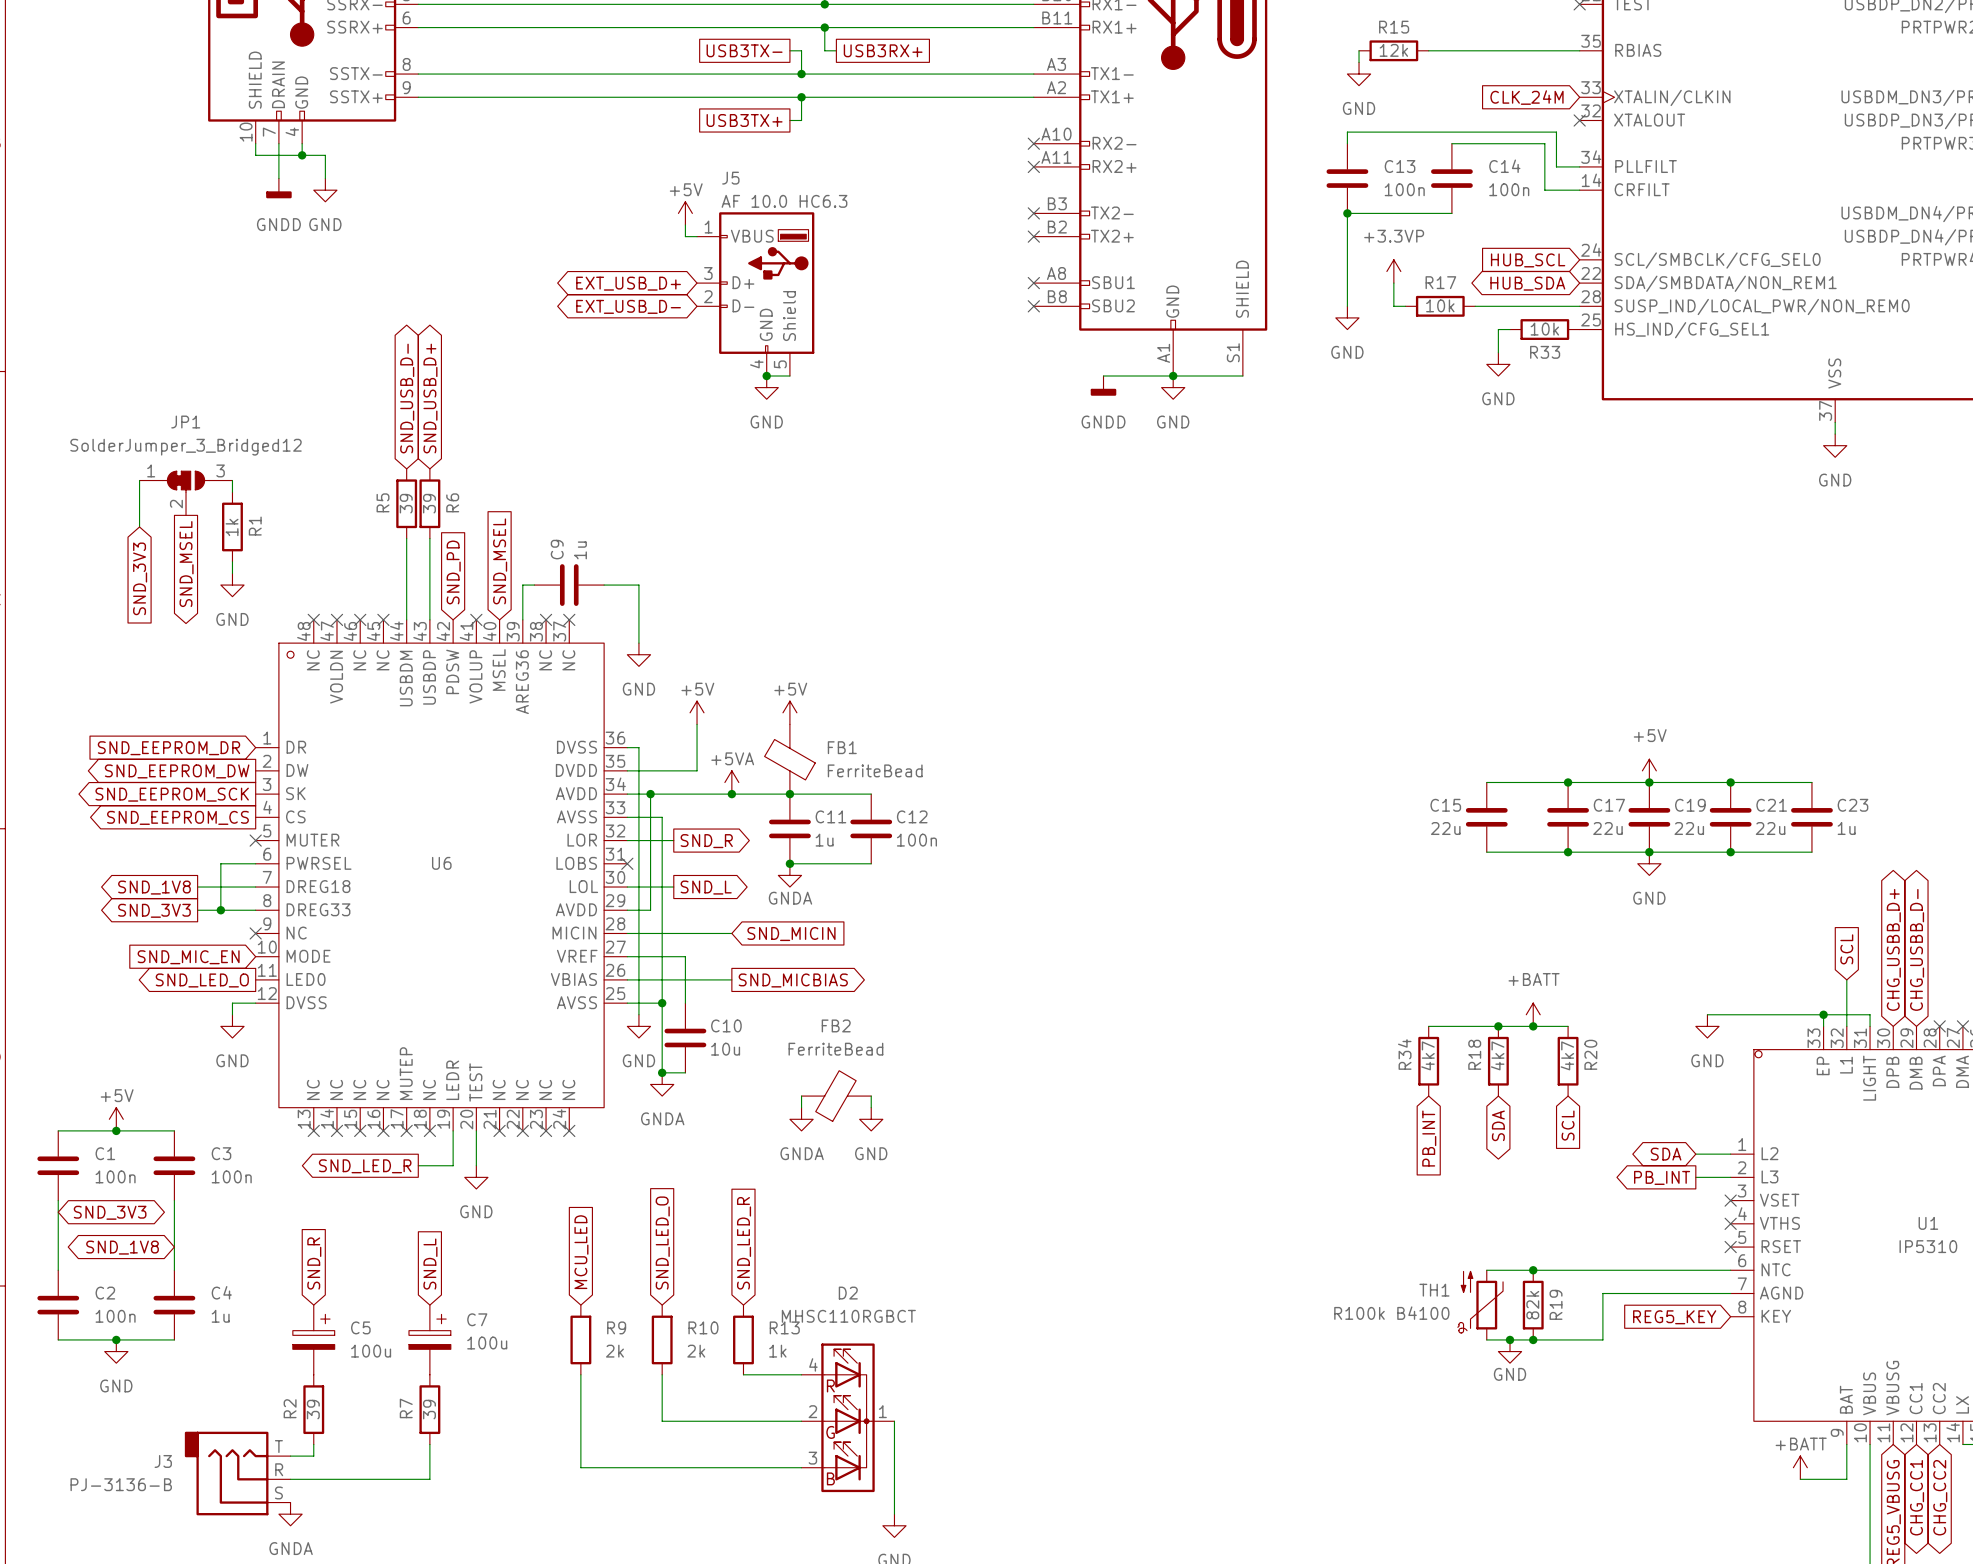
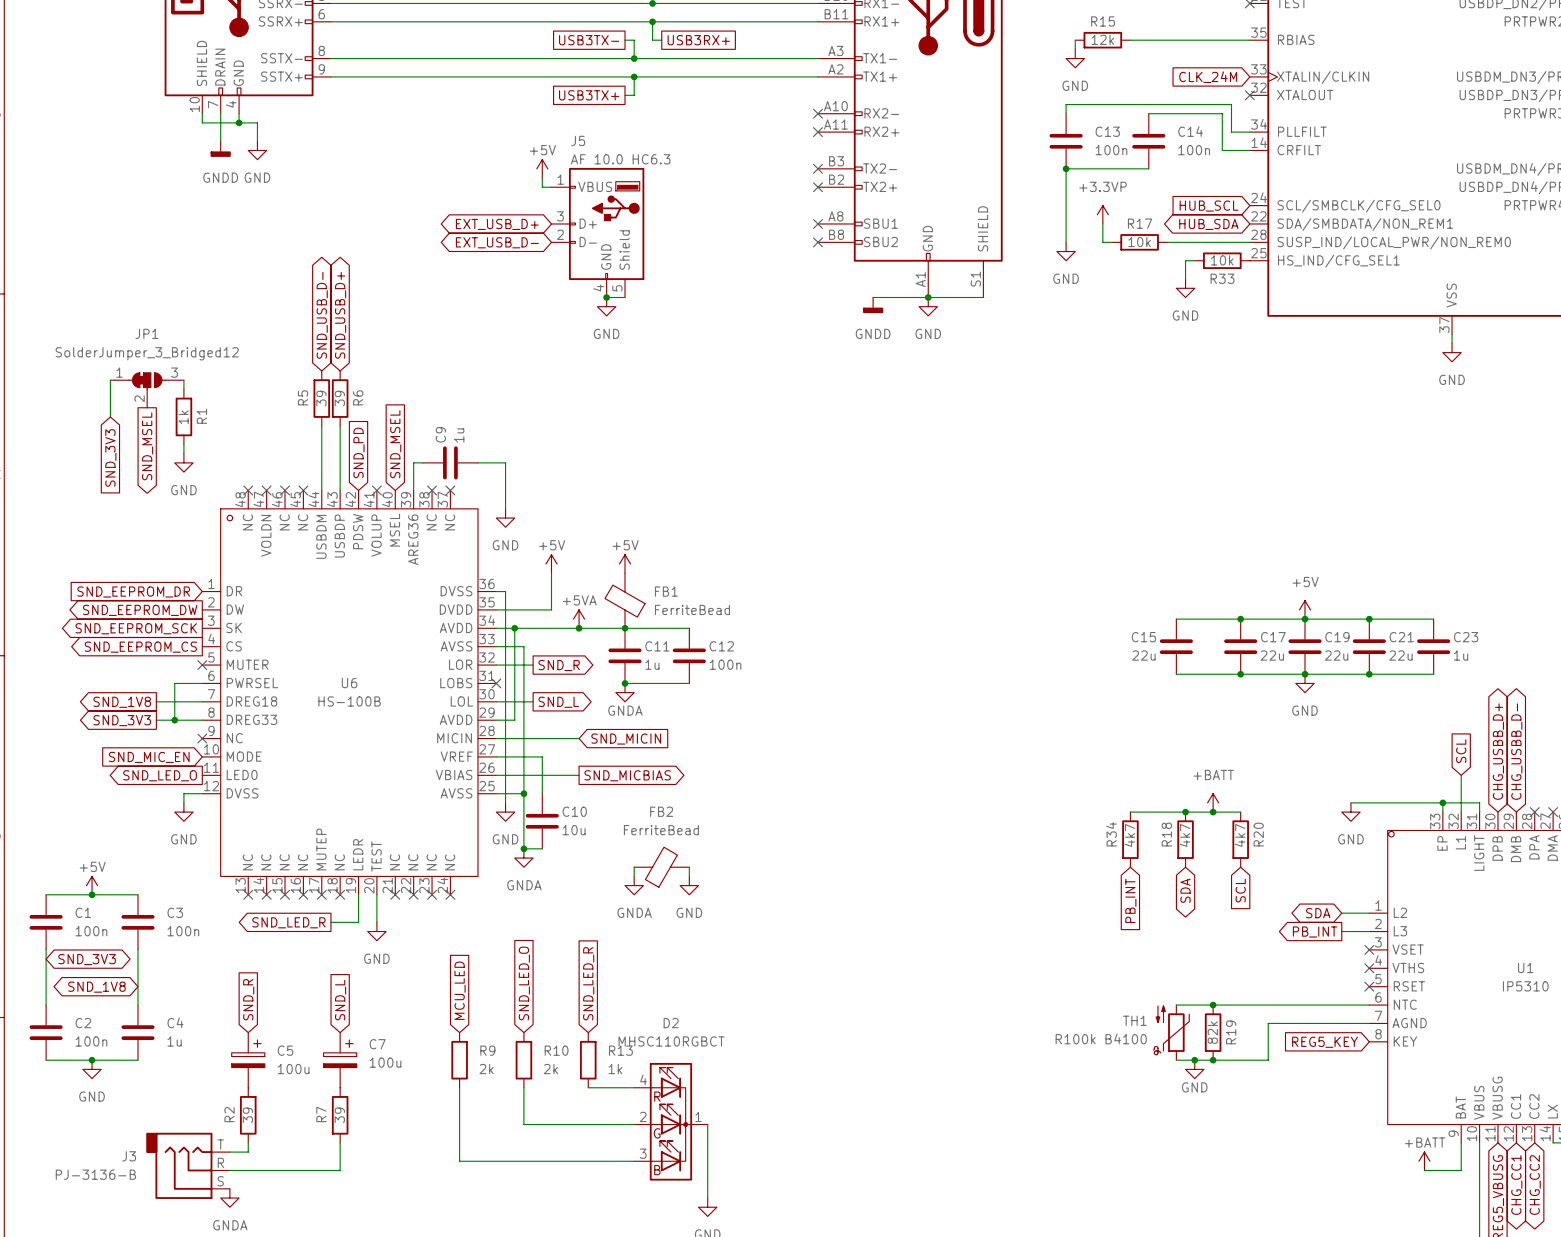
U6 value: none -> HS-100B (349, 701)

